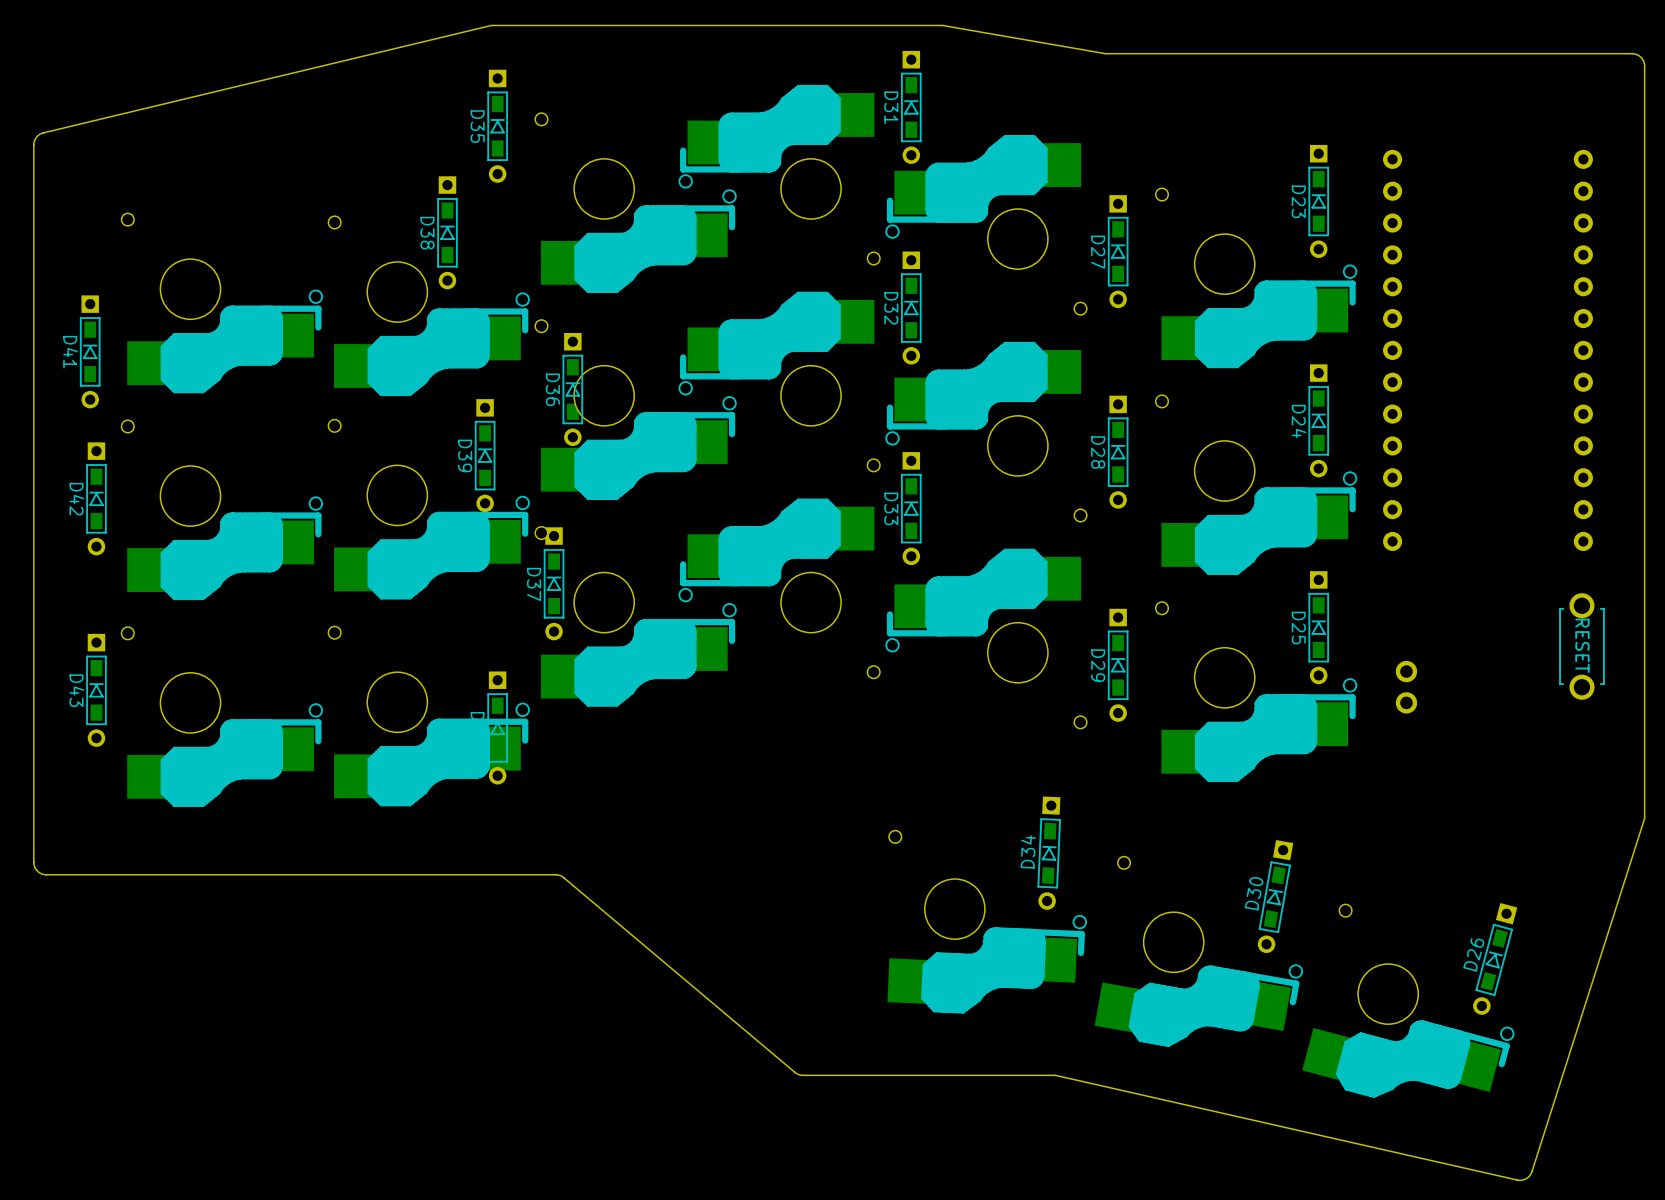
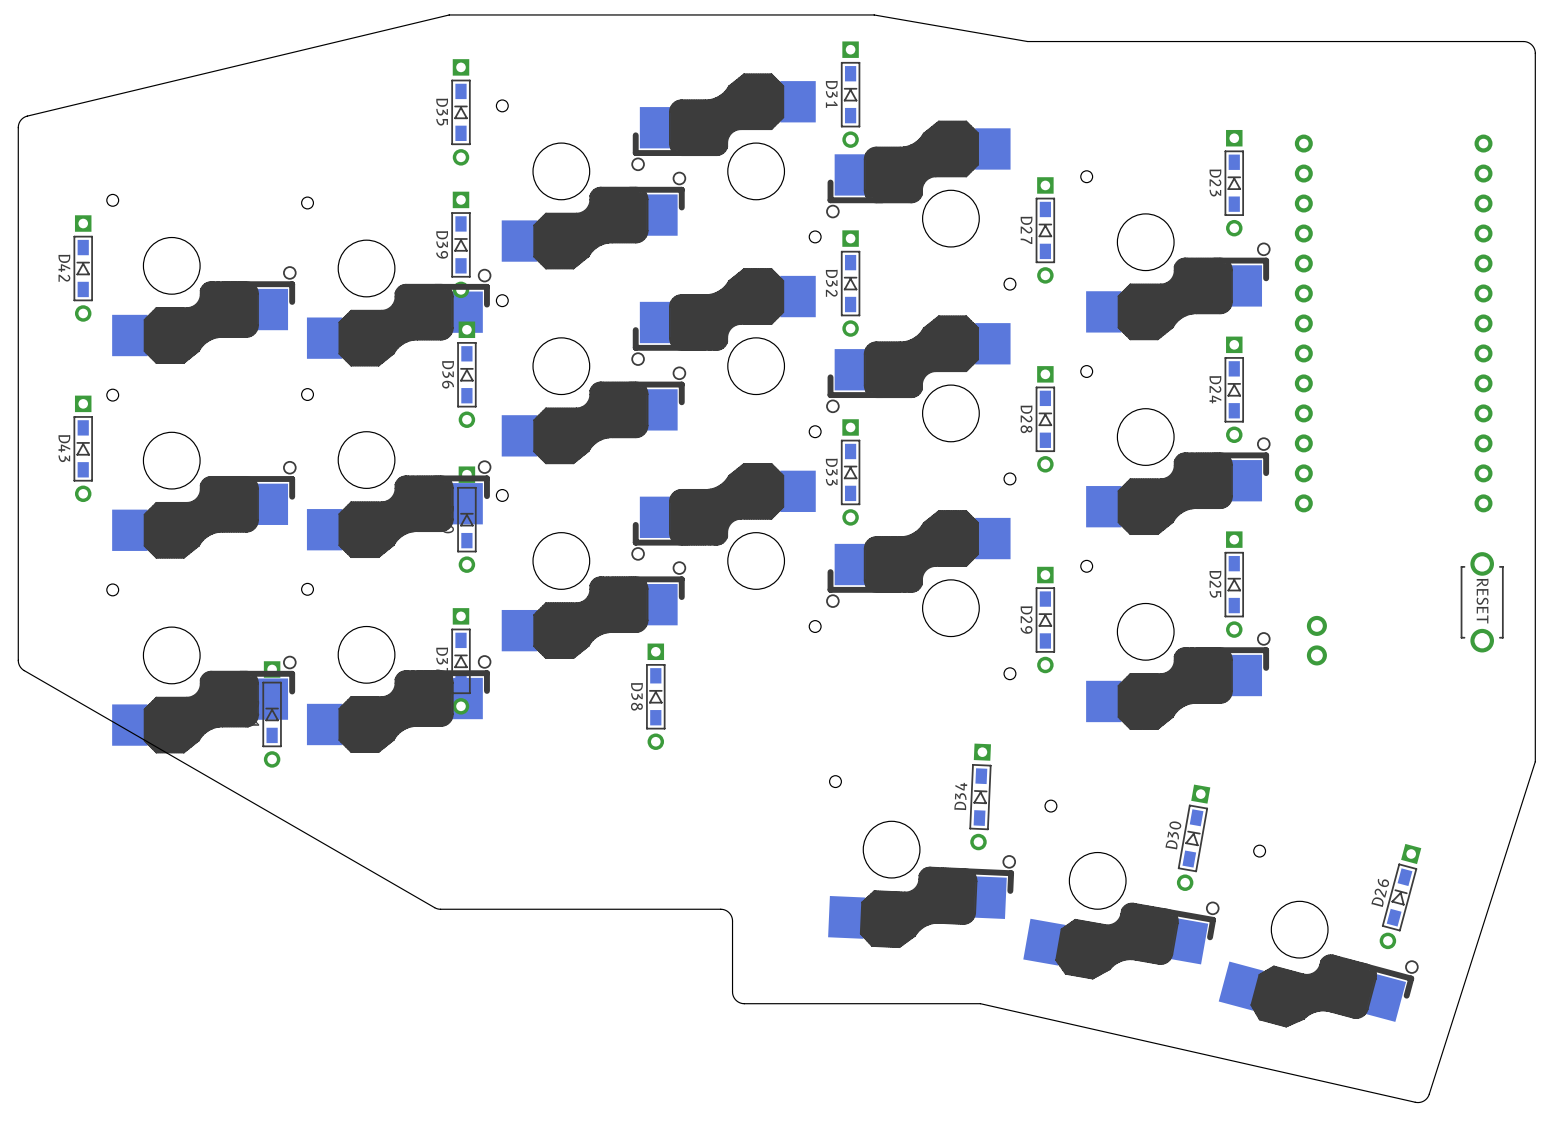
board edge: (942, 25) (1105, 53) (1632, 53) (1638, 55) (1642, 59) (1644, 66) (1644, 818) (1532, 1171) (1526, 1178) (1517, 1180) (1055, 1075) (798, 1074) (558, 875) (46, 874) (39, 872) (35, 867) (33, 145) (37, 136) (43, 132) (491, 25) (942, 25) -> (874, 14) (1027, 41) (1523, 41) (1529, 43) (1534, 48) (1535, 761) (1429, 1094) (1423, 1100) (1415, 1102) (980, 1003) (740, 1003) (735, 999) (732, 993) (732, 919) (725, 910) (436, 908) (24, 670) (19, 665) (18, 127) (22, 118) (449, 14) (874, 14)
D38 position: (447, 232) -> (655, 696)
D41 position: (90, 351) -> (272, 714)
D36 position: (572, 389) -> (466, 374)
D39 position: (485, 455) -> (461, 244)
D42 position: (96, 498) -> (83, 268)
D37 position: (554, 583) -> (461, 661)
D43 position: (96, 690) -> (83, 448)
part position: (497, 727) -> (466, 519)

